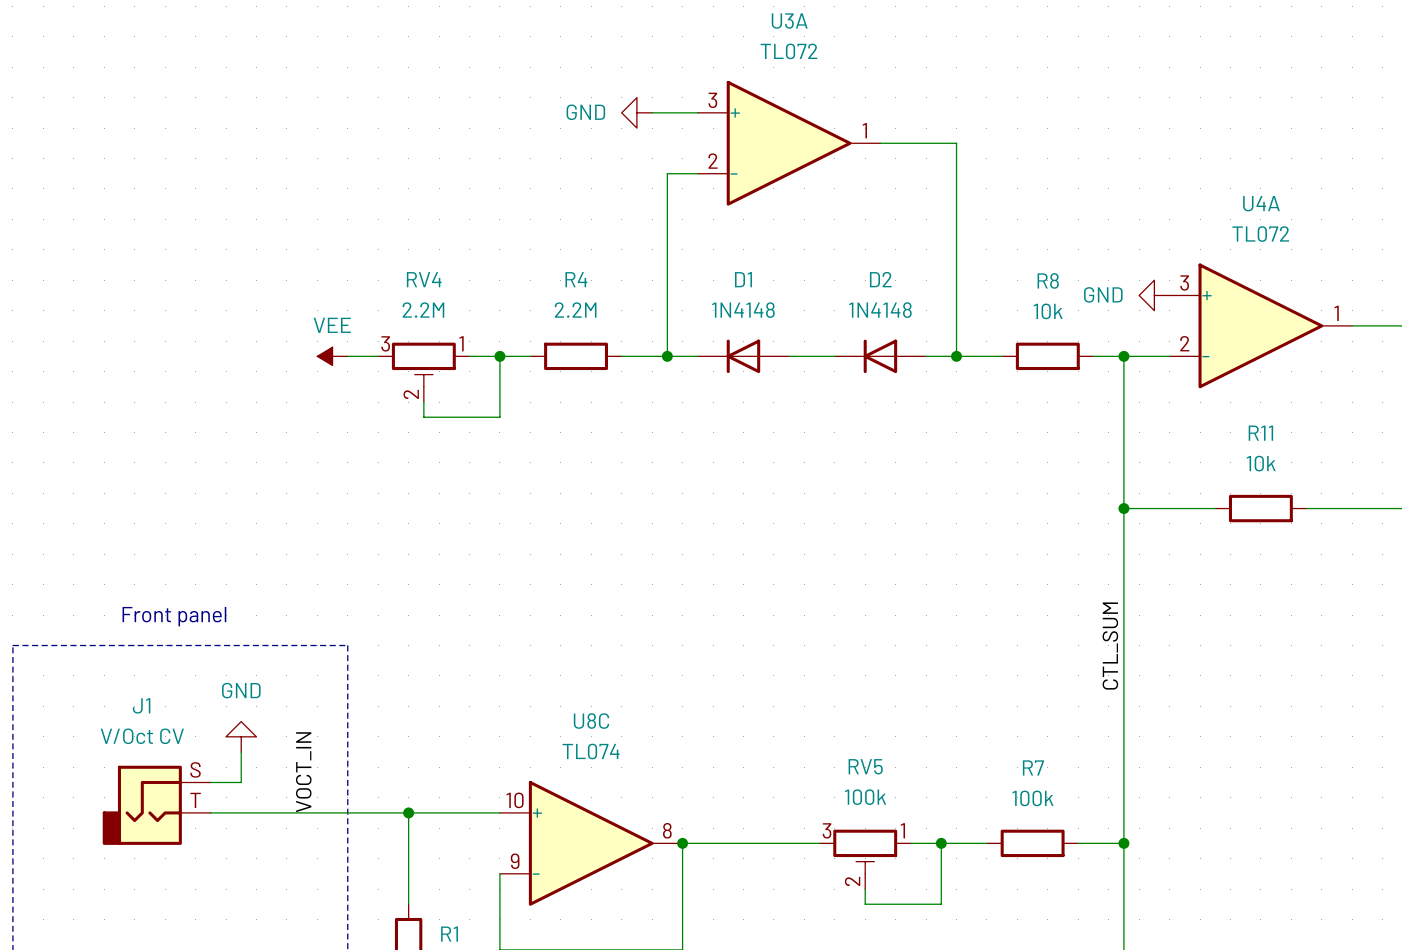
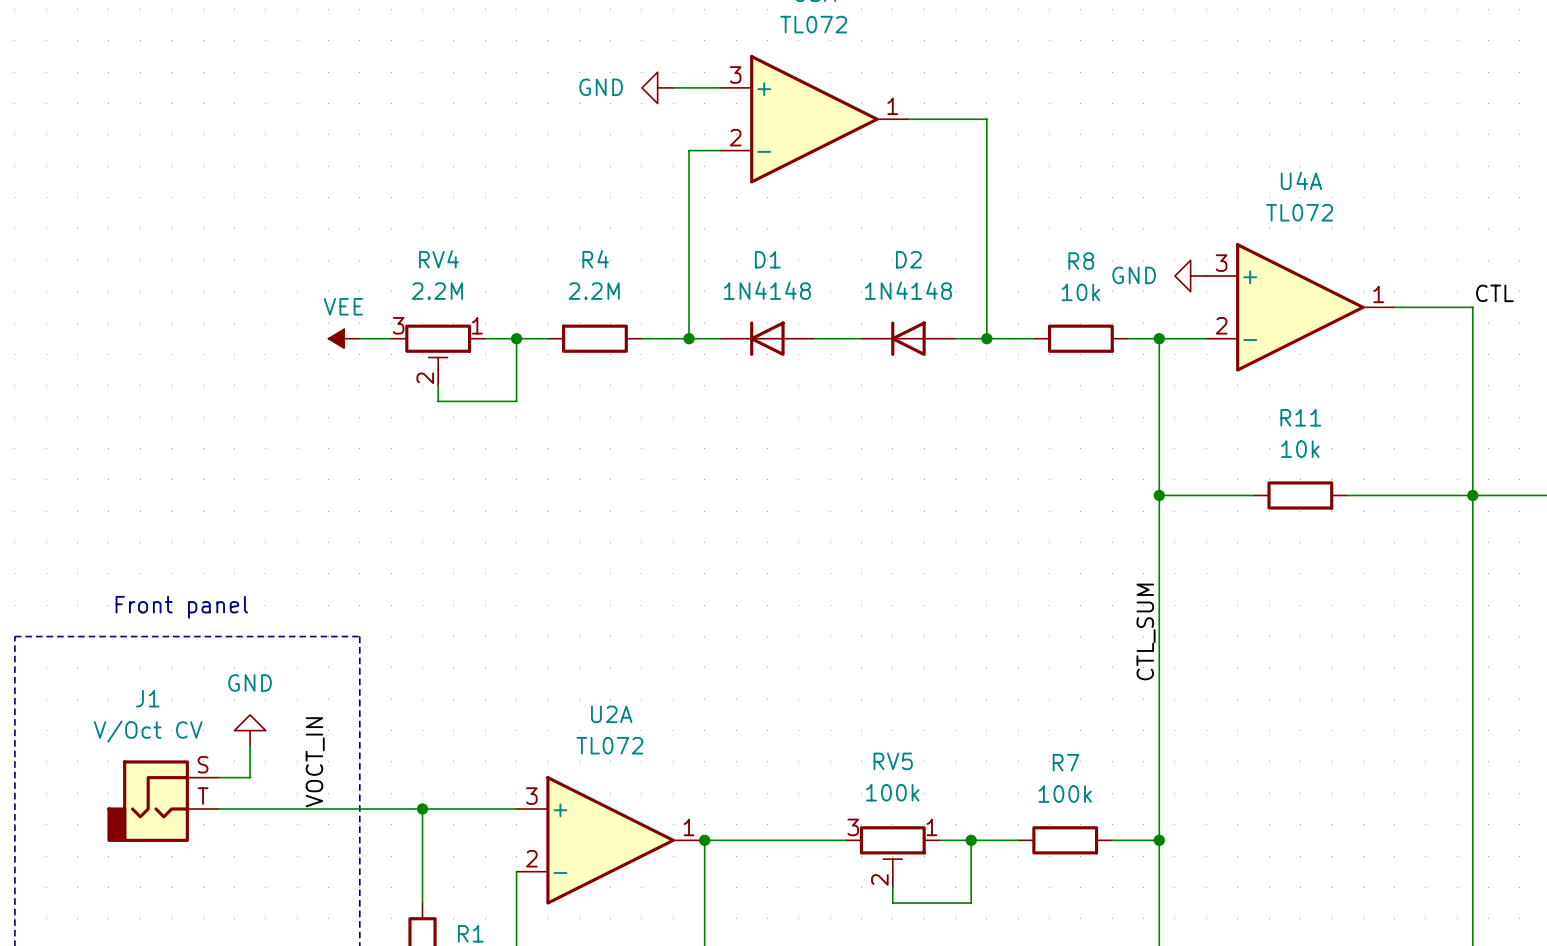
U8C name: U8C (591, 721) -> U2A (611, 714)
U8C value: TL074 (591, 751) -> TL072 (609, 745)
U8C pin number: 10 (515, 800) -> 3 (531, 796)
U8C pin number: 8 (667, 830) -> 1 (689, 827)
U8C pin number: 9 (515, 861) -> 2 (531, 858)

